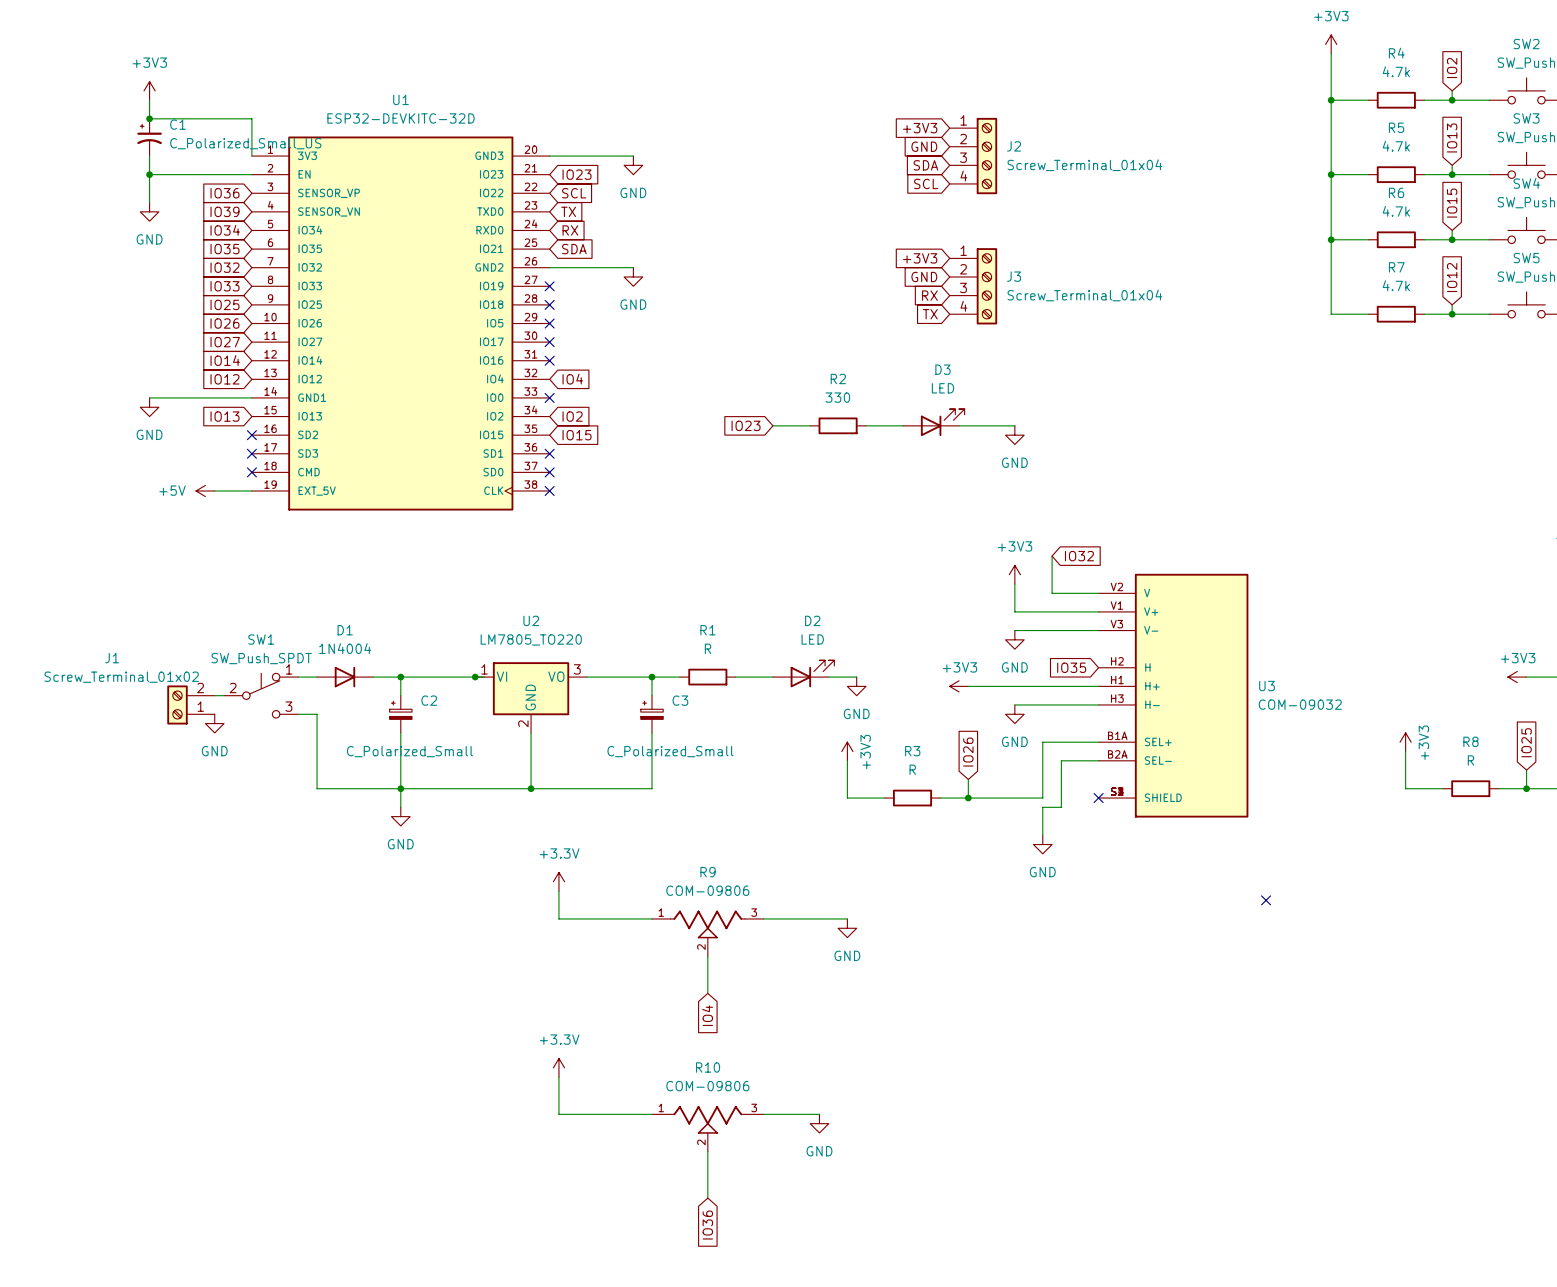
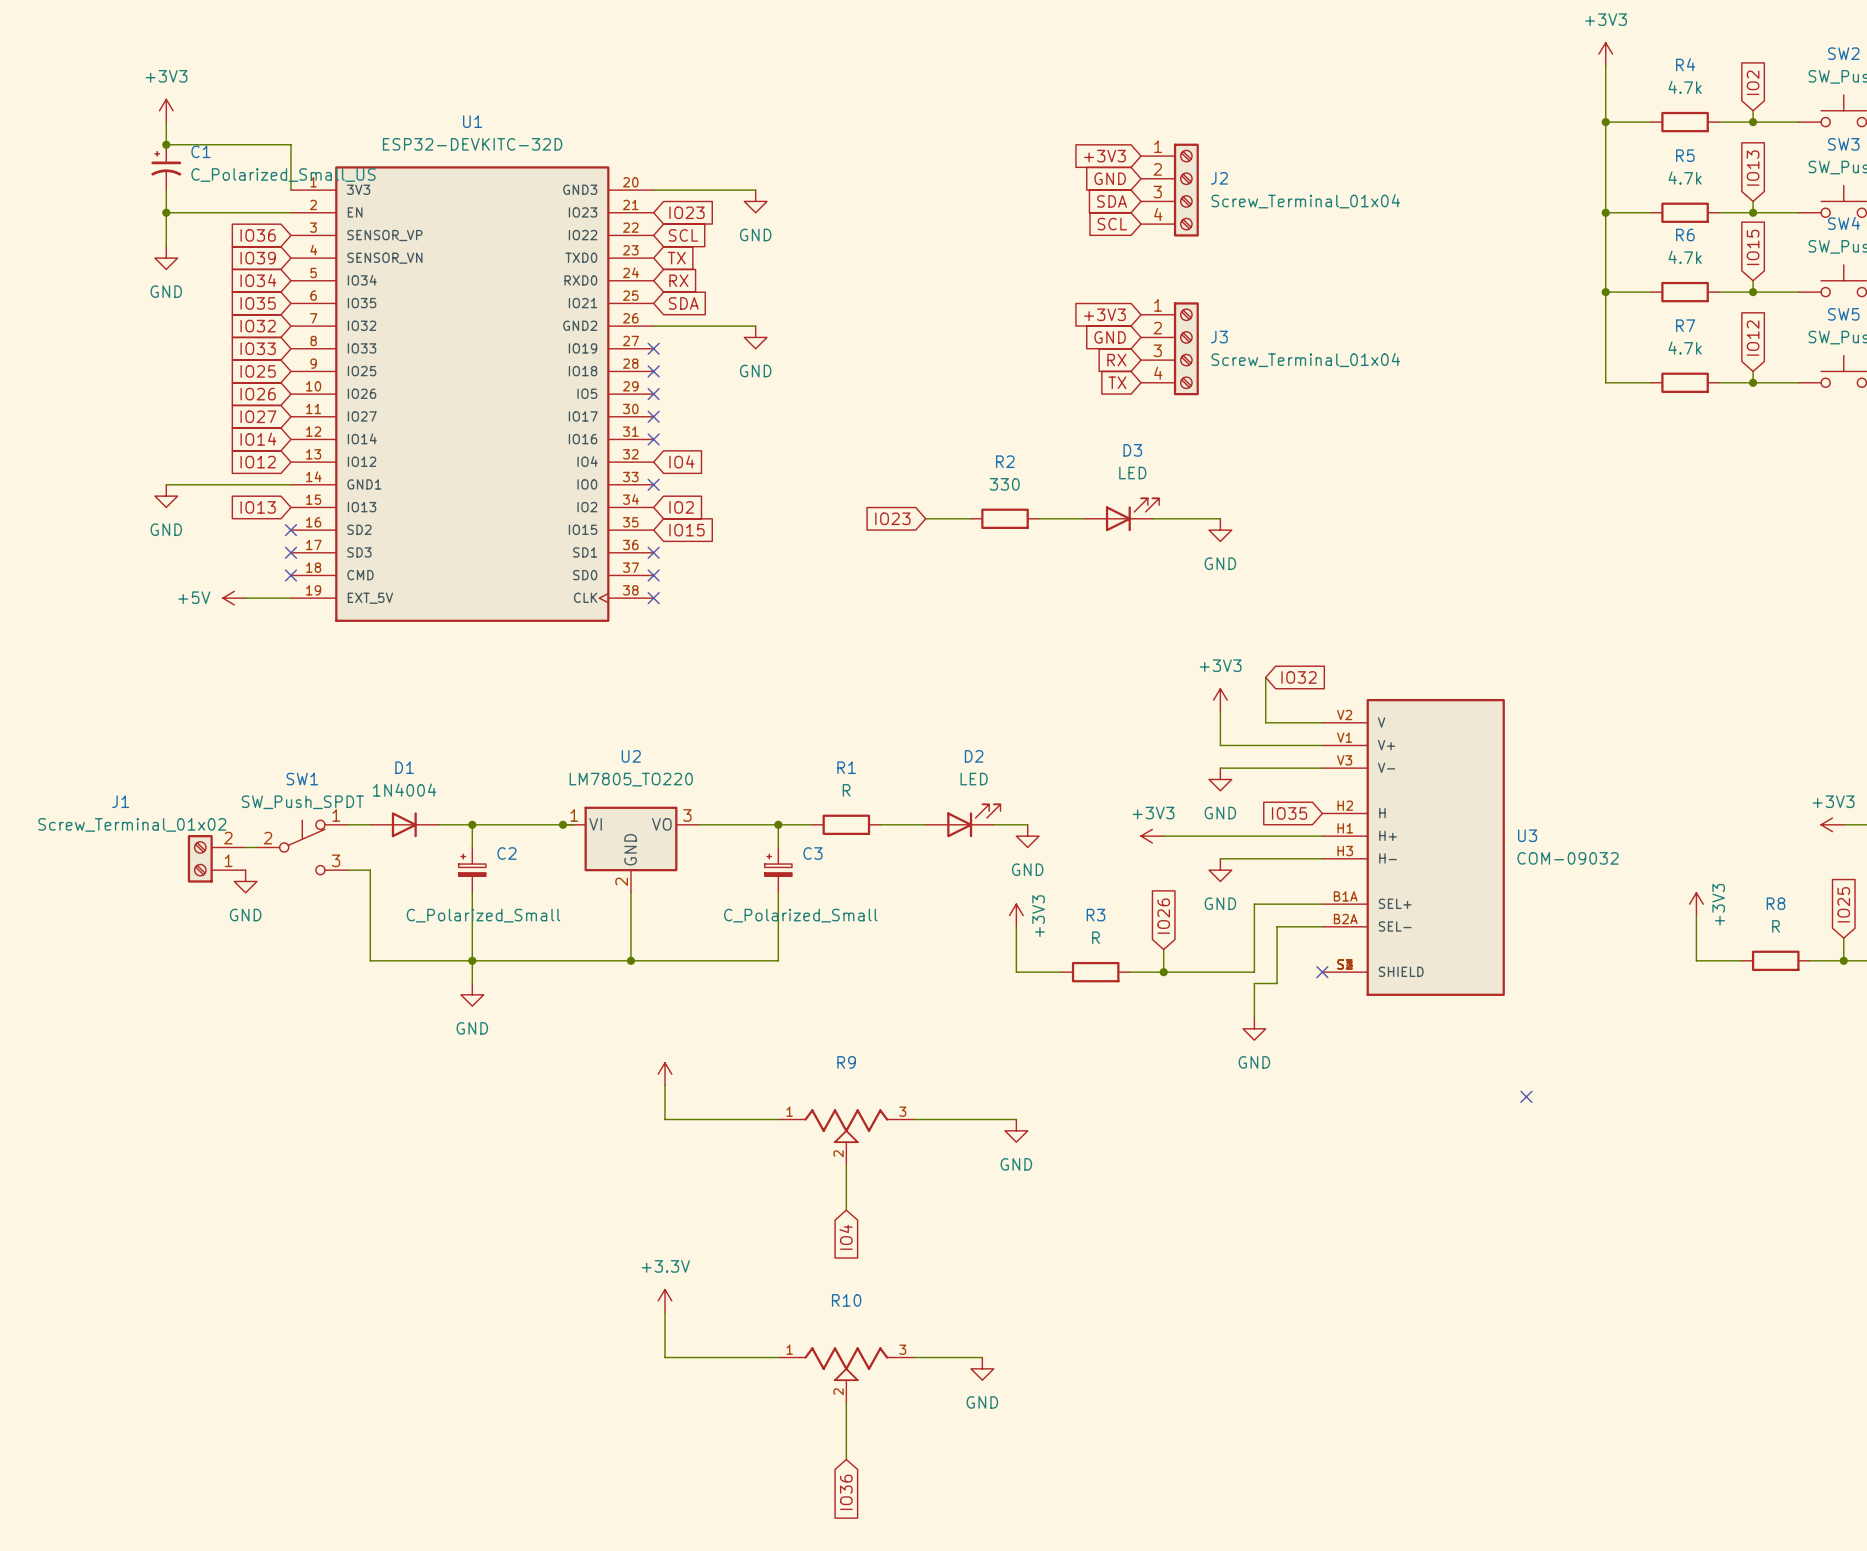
power symbol text: +3.3V (559, 853) -> none
R9 value: COM-09806 (707, 890) -> none
R10 value: COM-09806 (707, 1086) -> none

